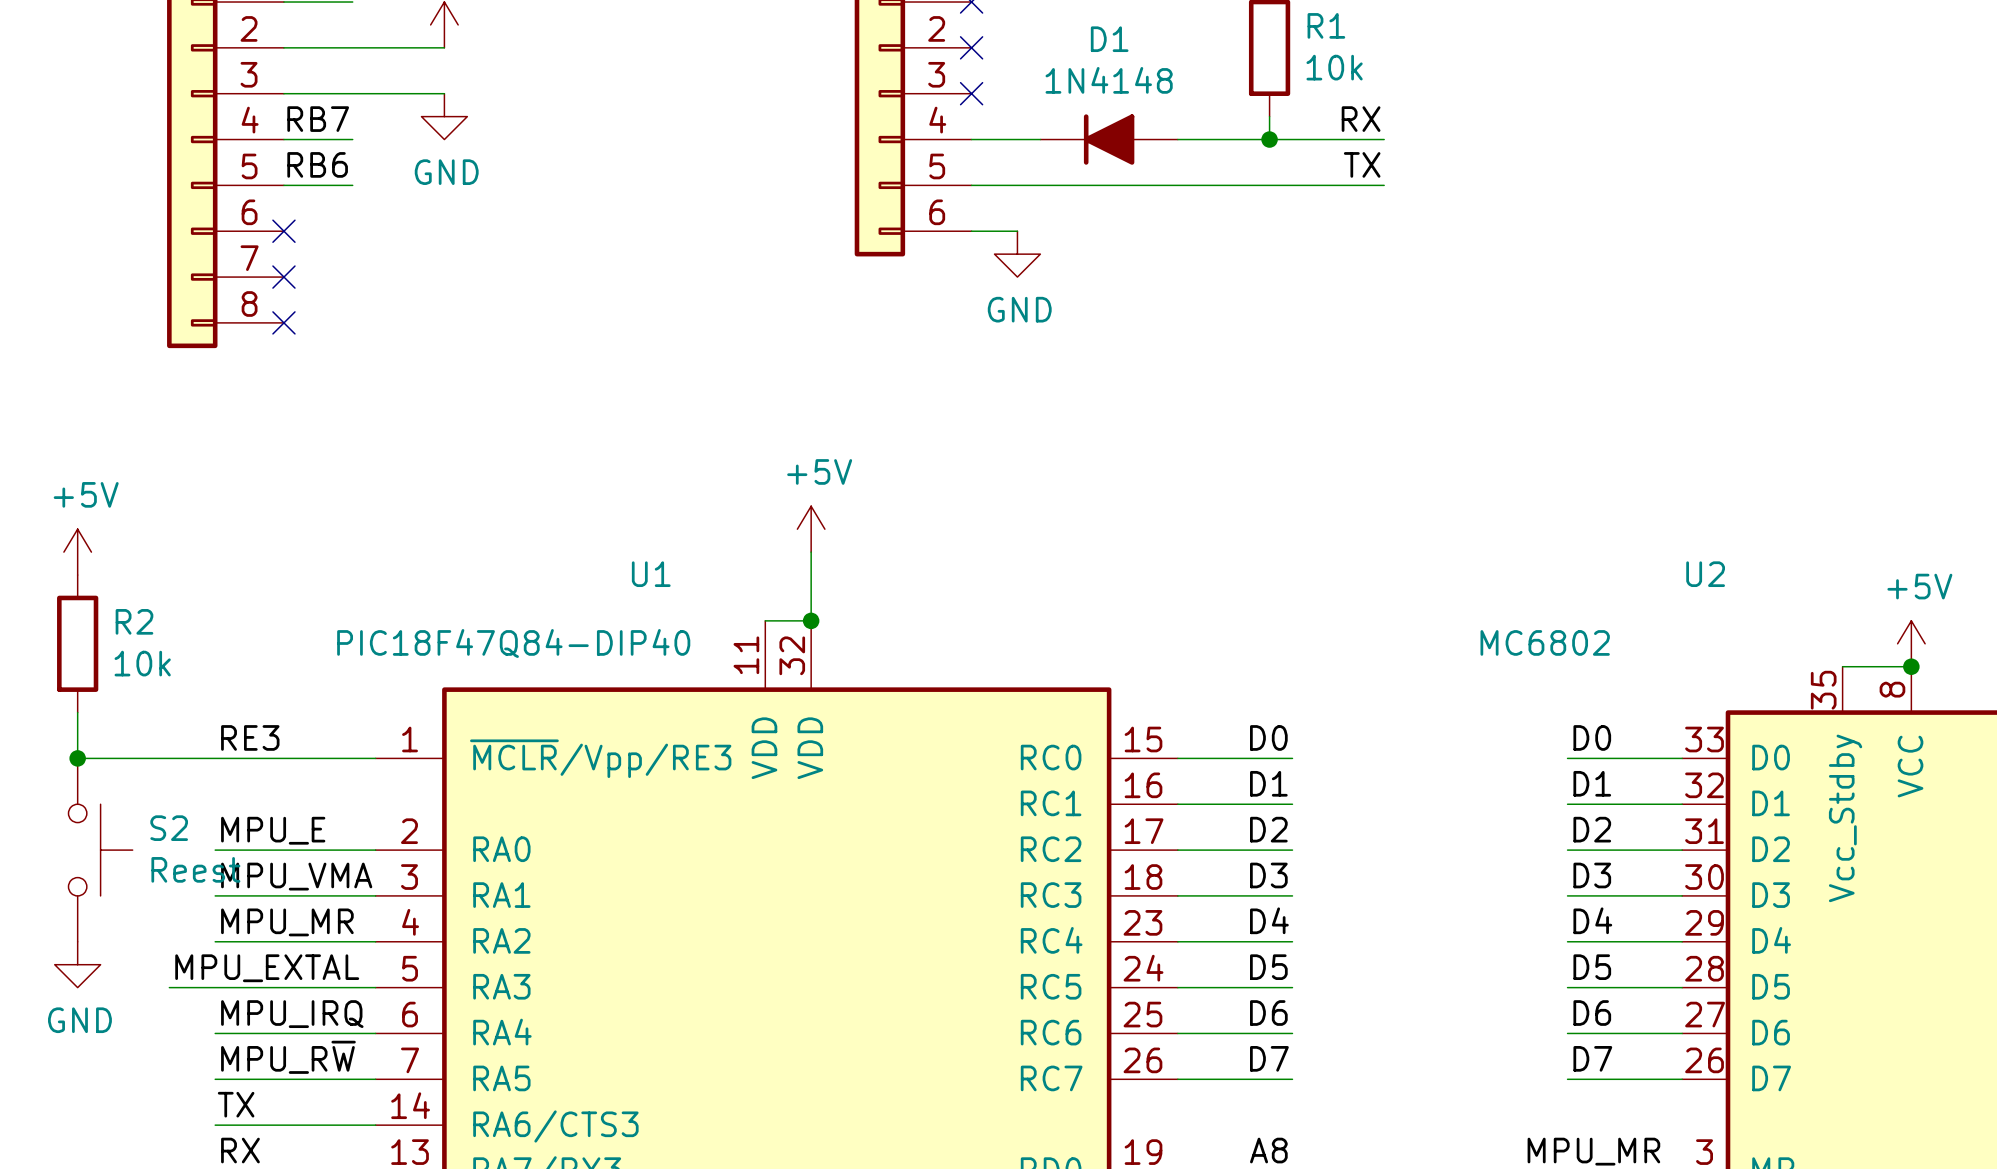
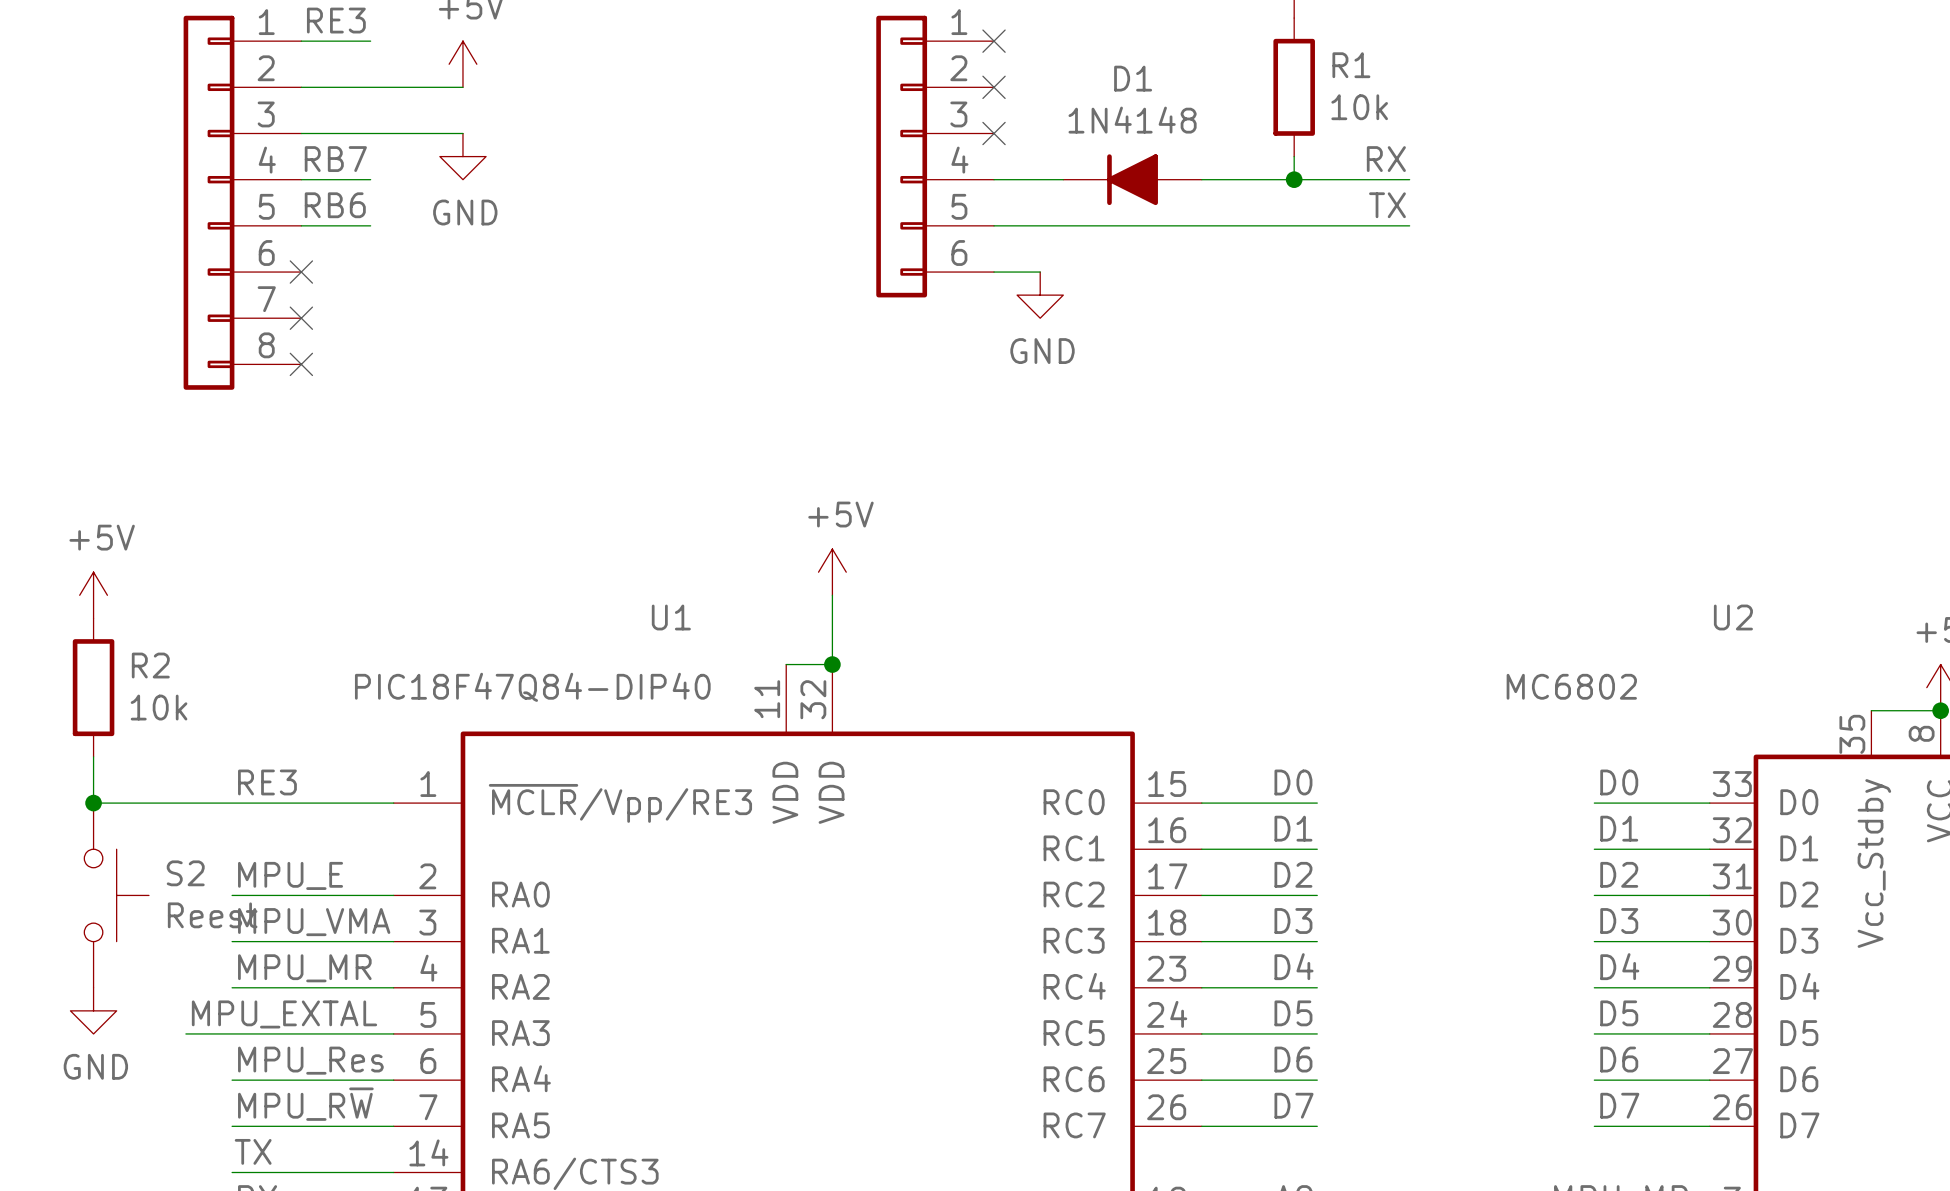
label: MPU_IRQ (292, 1014) -> MPU_Res (310, 1060)

